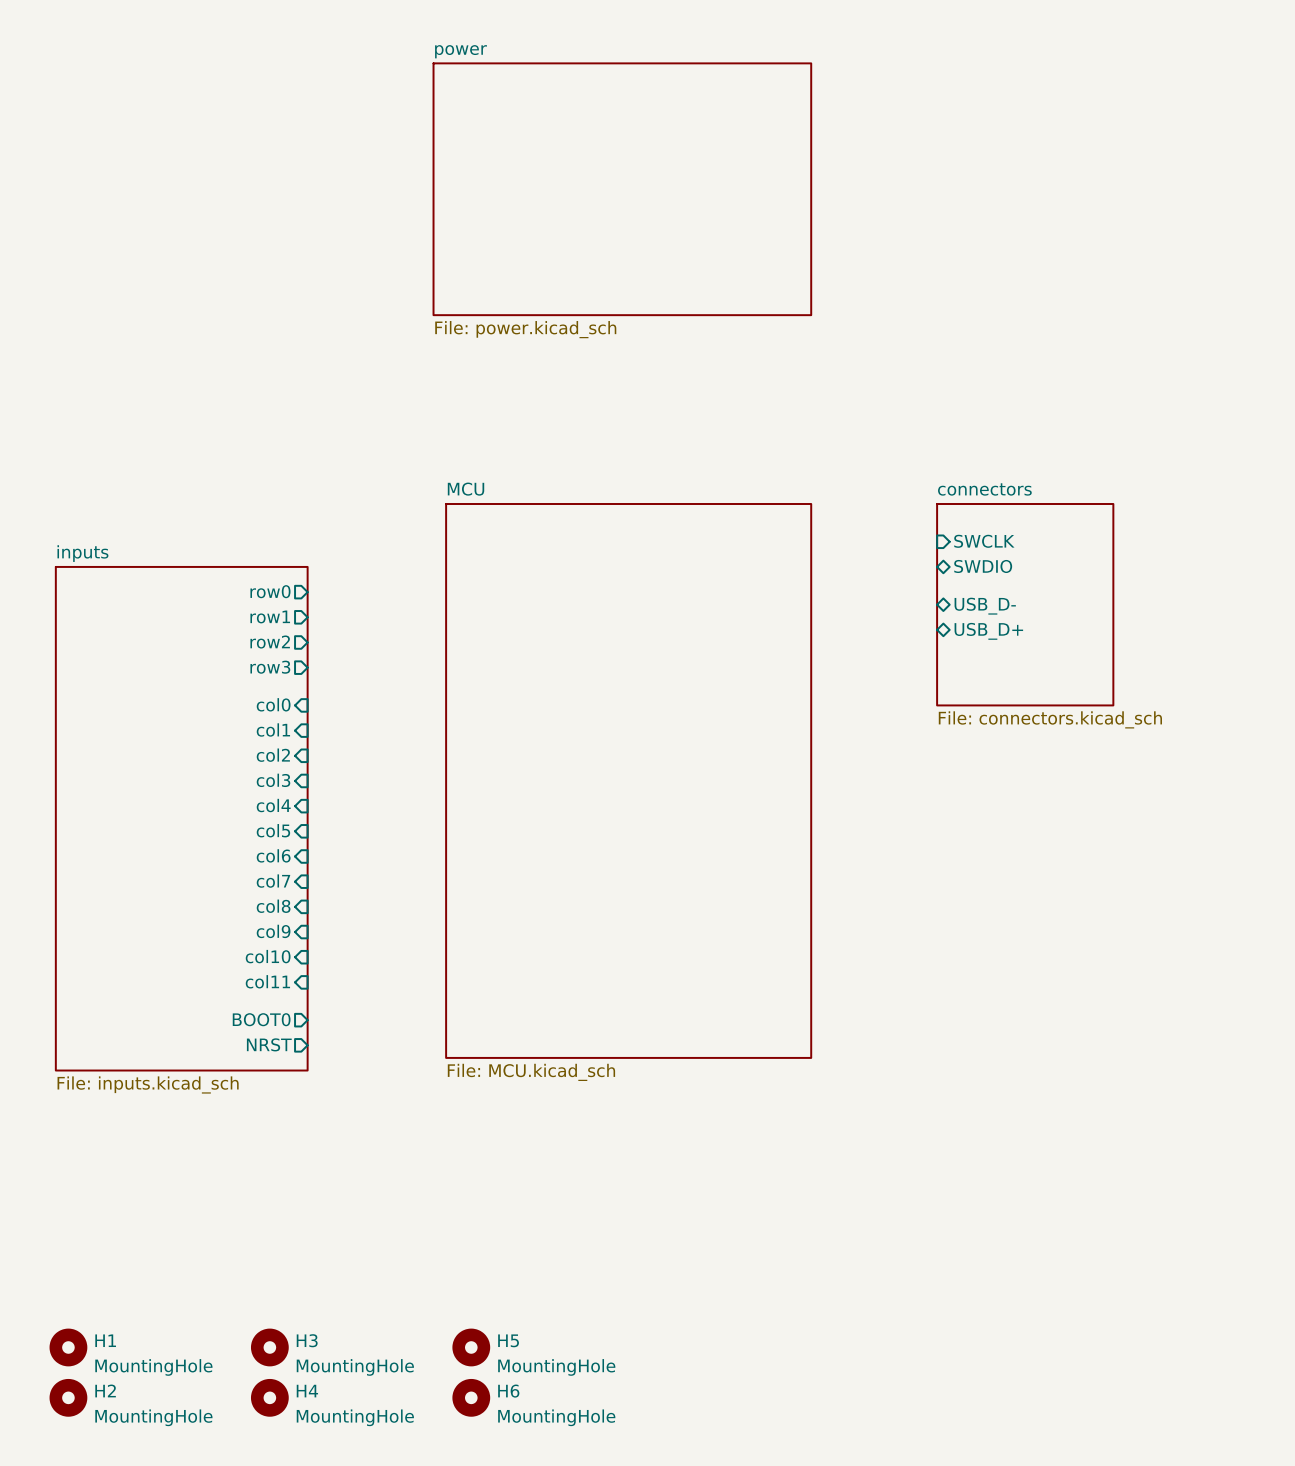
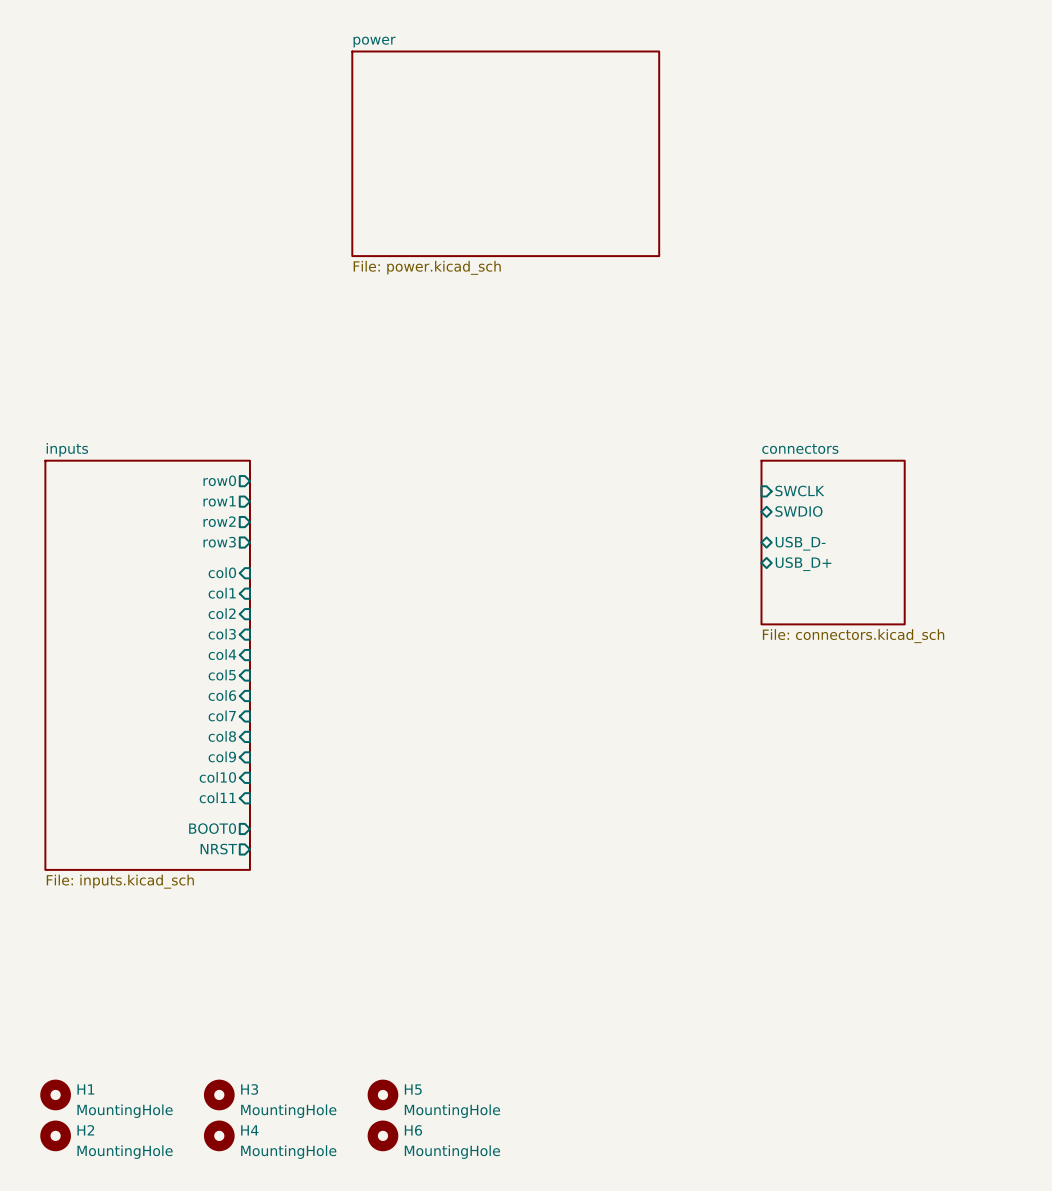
sheet pin: SWCLK (984, 541) -> none
sheet pin: SWDIO (983, 566) -> none
sheet connectors position: (1025, 604) -> (833, 542)
sheet pin shape: bidirectional (985, 606) -> input (799, 491)
sheet pin: USB_D- (985, 606) -> SWCLK (799, 491)
sheet pin: USB_D+ (988, 631) -> SWDIO (798, 511)
sheet pin: none -> USB_D- (800, 543)
sheet pin: none -> USB_D+ (803, 564)
sheet MCU: File: MCU.kicad_sch (628, 780) -> none

